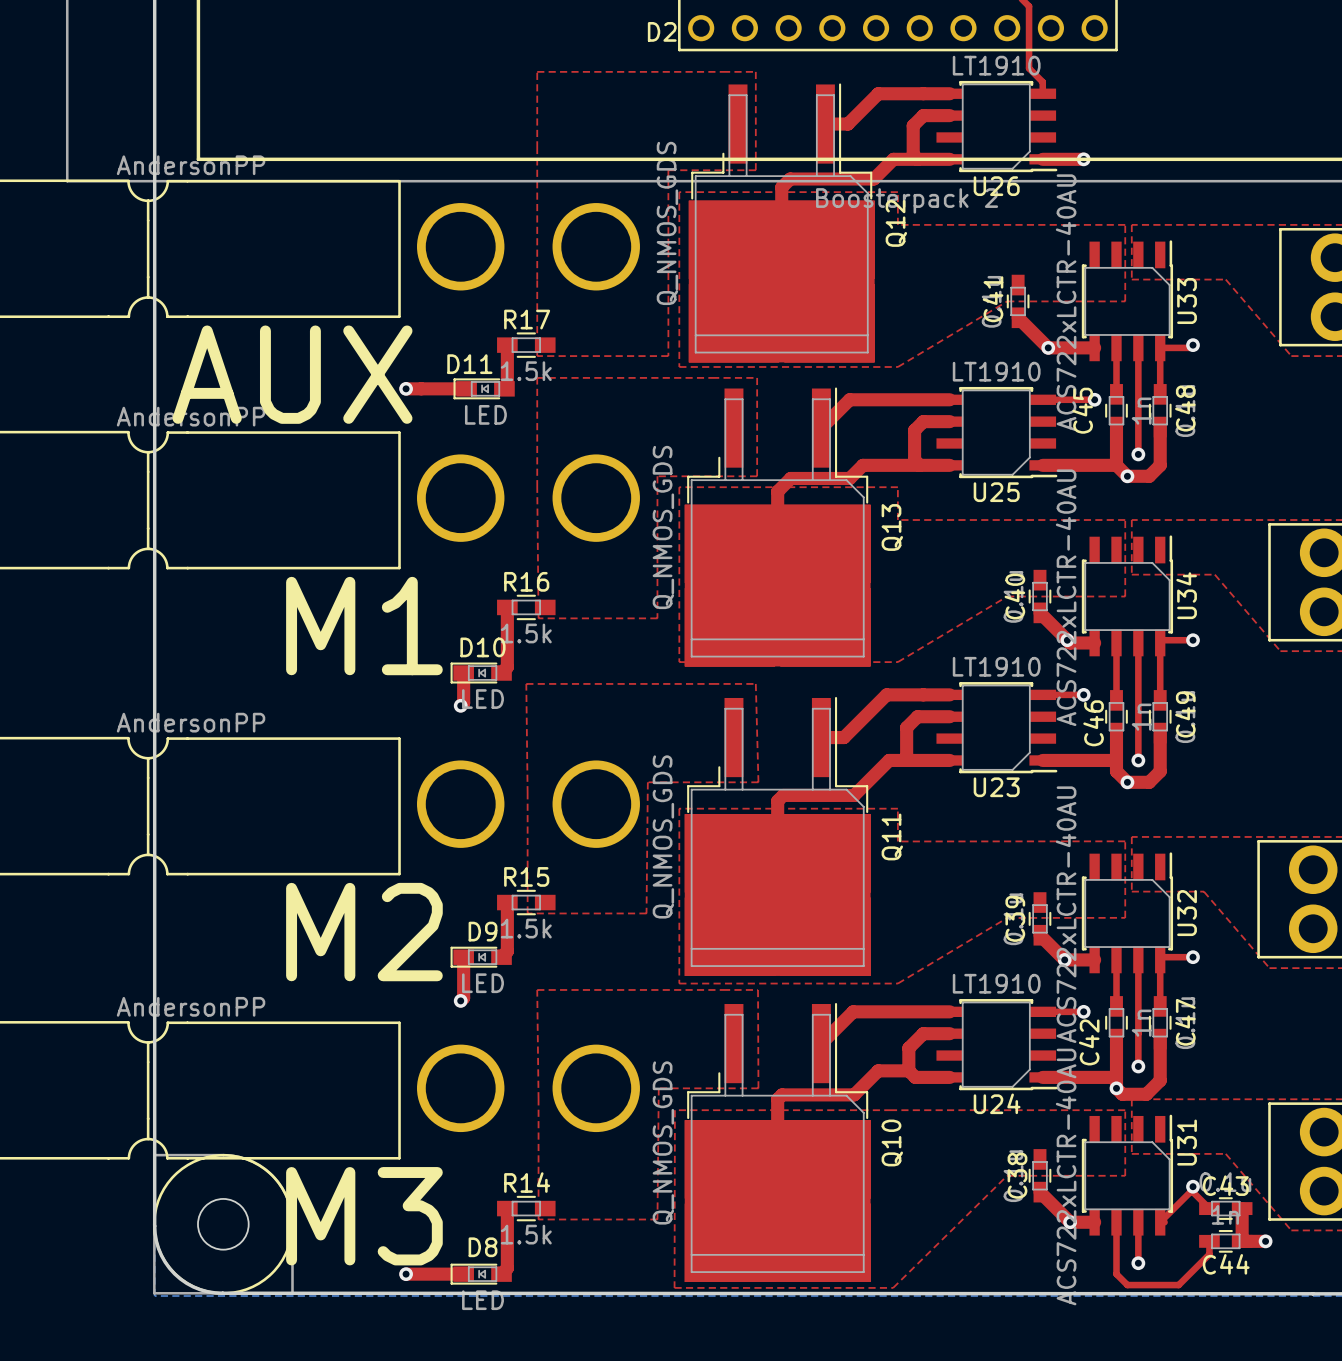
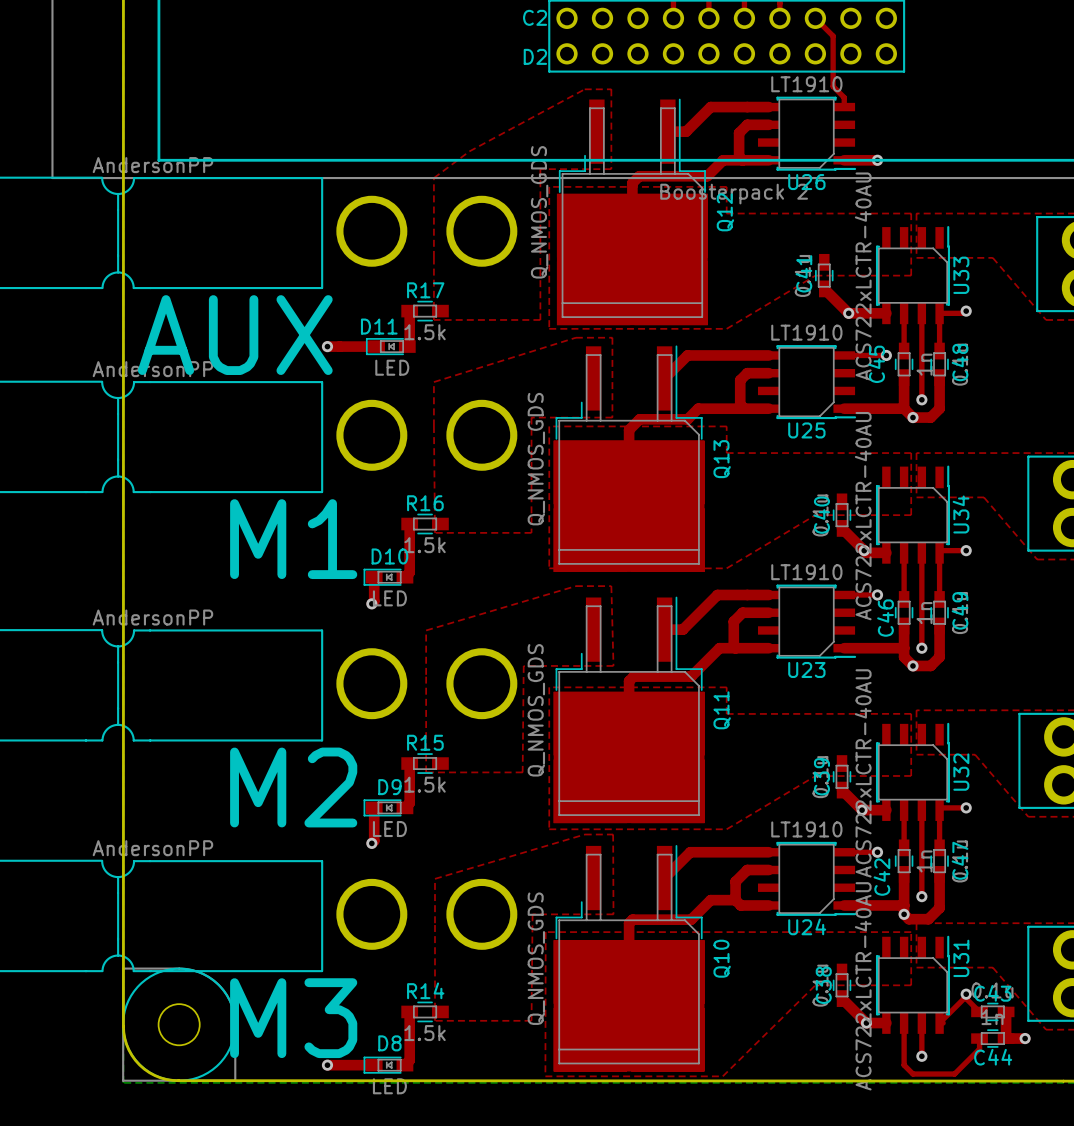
top zone outline: (723, 71) (537, 71) (537, 181) -> (584, 89) (469, 151) (433, 178)
top zone outline: (712, 377) (537, 377) (537, 432) -> (575, 337) (433, 382)
top zone outline: (712, 683) (526, 683) (527, 793) -> (575, 586) (426, 630) (426, 674)
top zone outline: (723, 989) (537, 989) (538, 1099) -> (584, 834) (435, 878) (435, 923)

